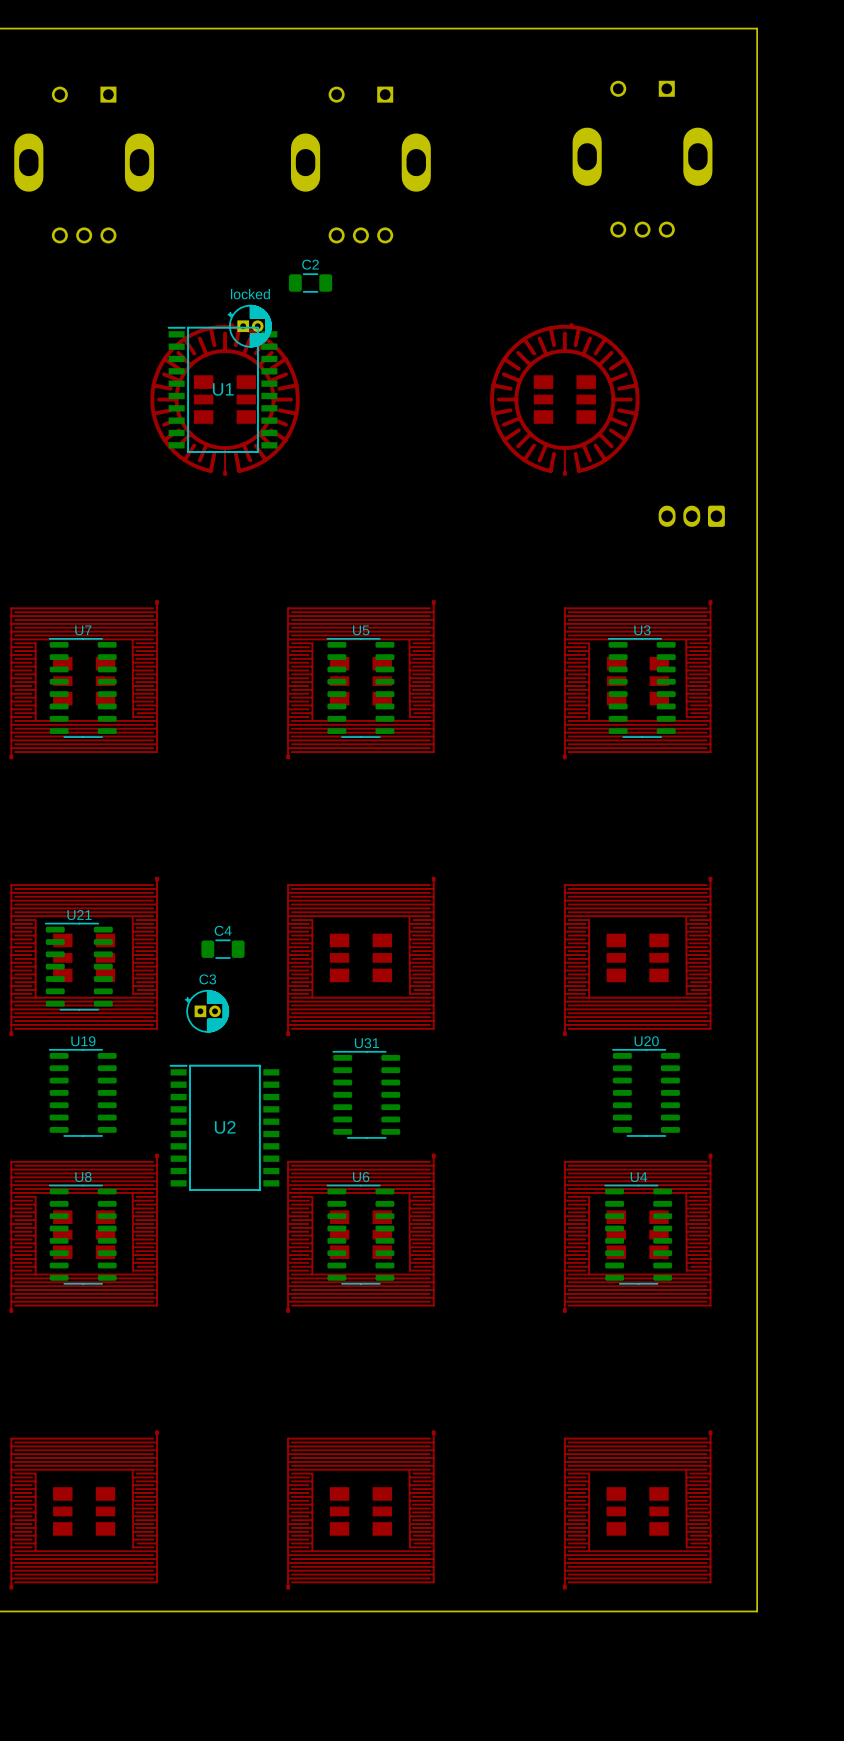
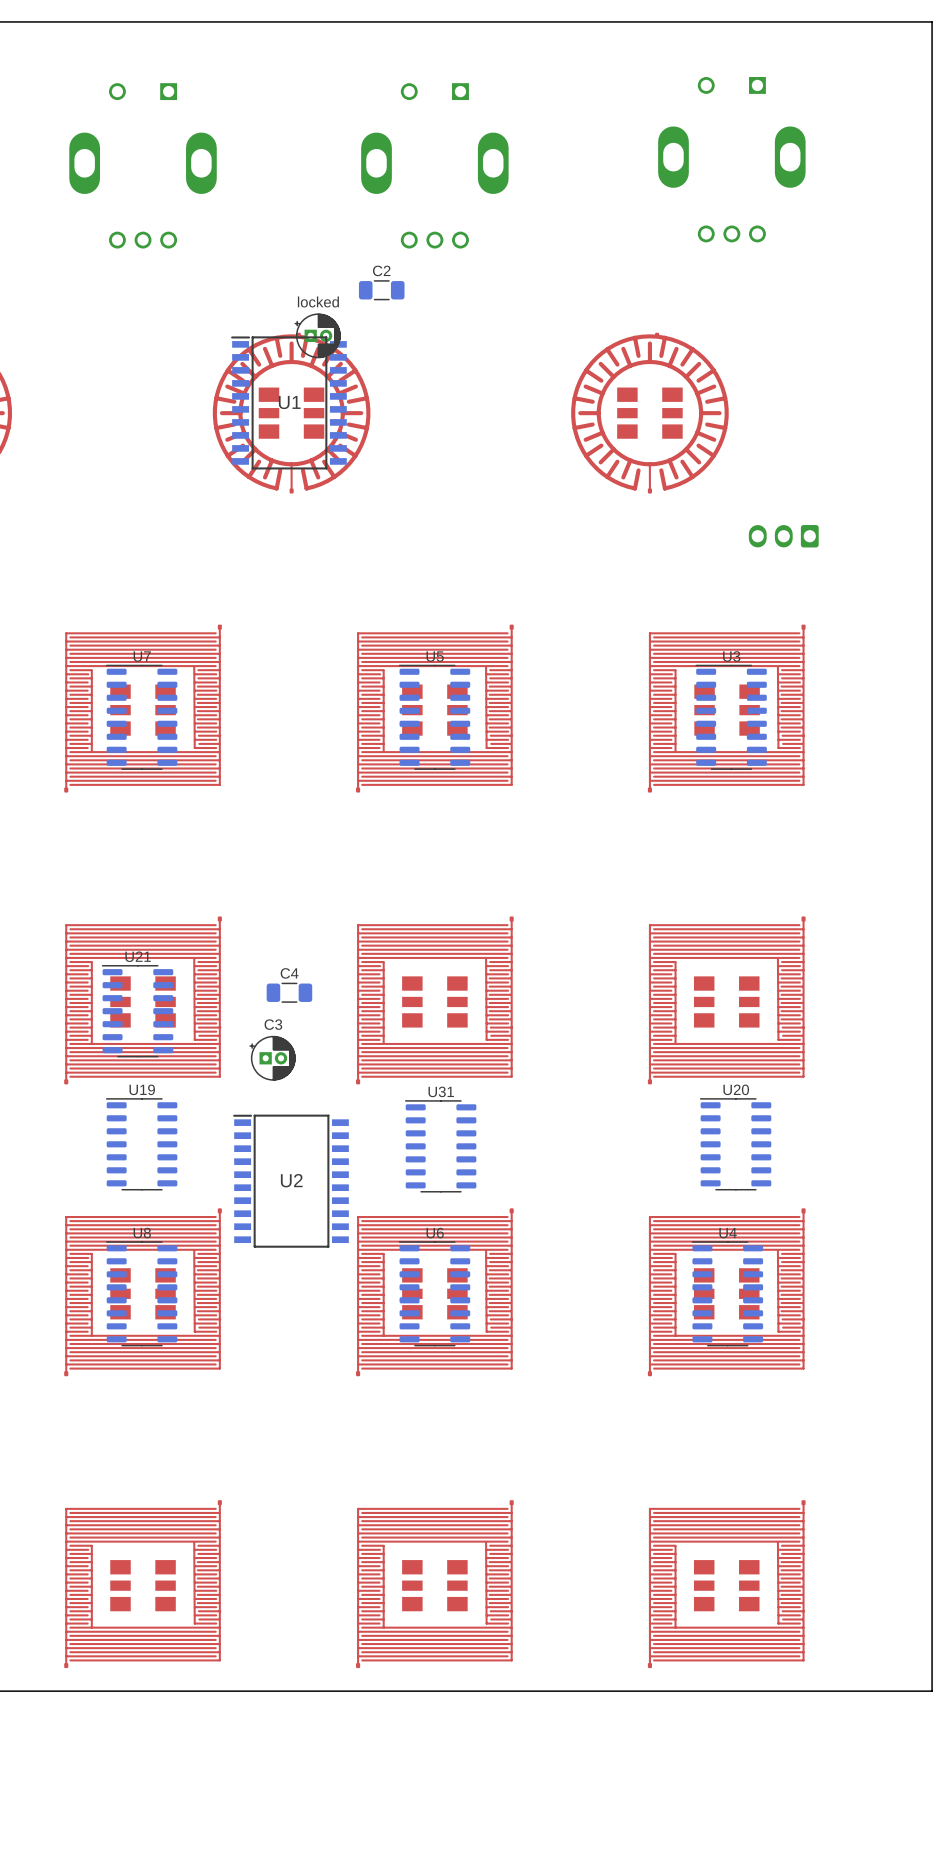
board edge: (757, 28) (757, 1611) -> (852, 21) (932, 21) (932, 1691) (852, 1691)

